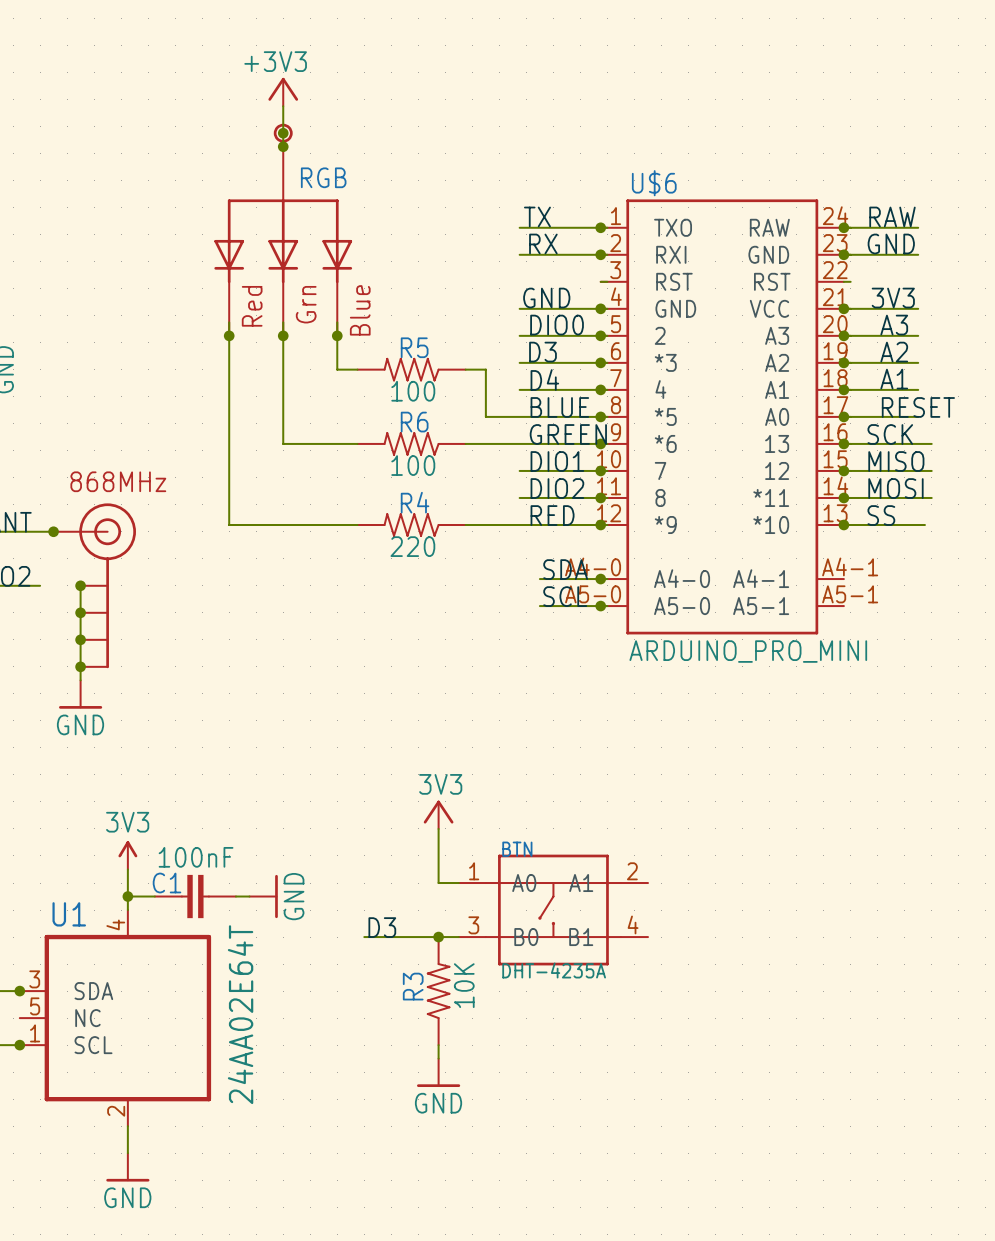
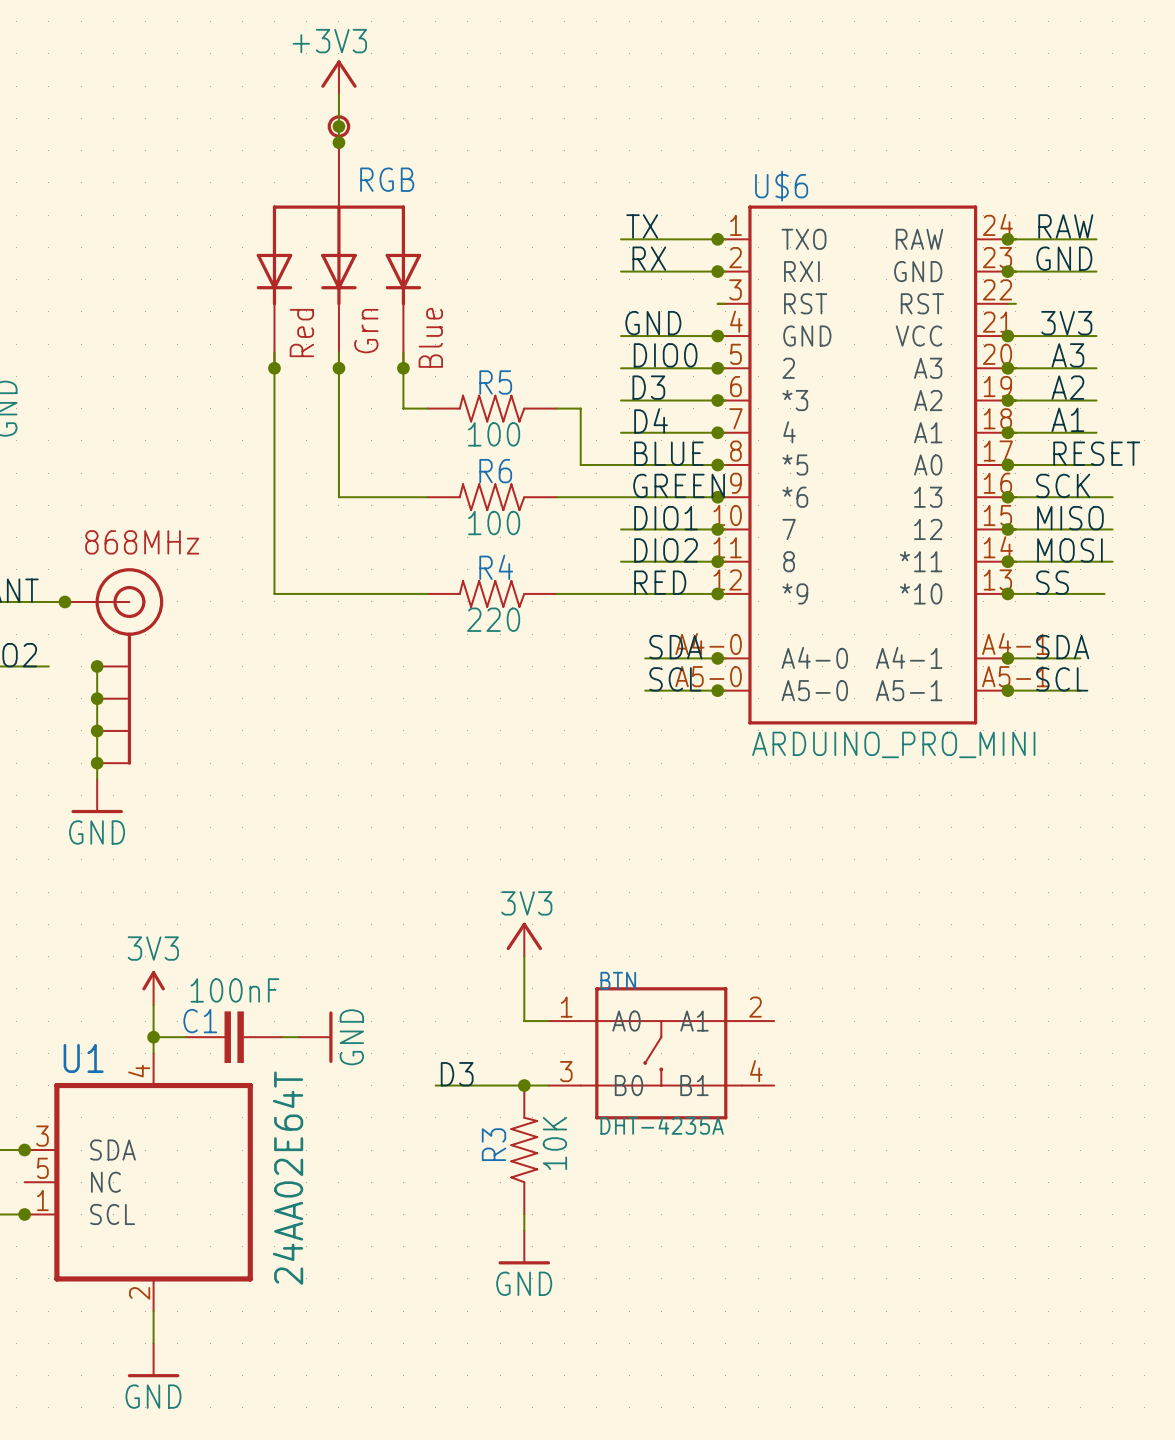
label: none -> SDA (1062, 647)
wire: none -> (1007, 658) (1080, 658)
junction: none -> (1007, 658)
label: none -> SCL (1062, 679)
wire: none -> (1007, 690) (1080, 690)
junction: none -> (1007, 690)

